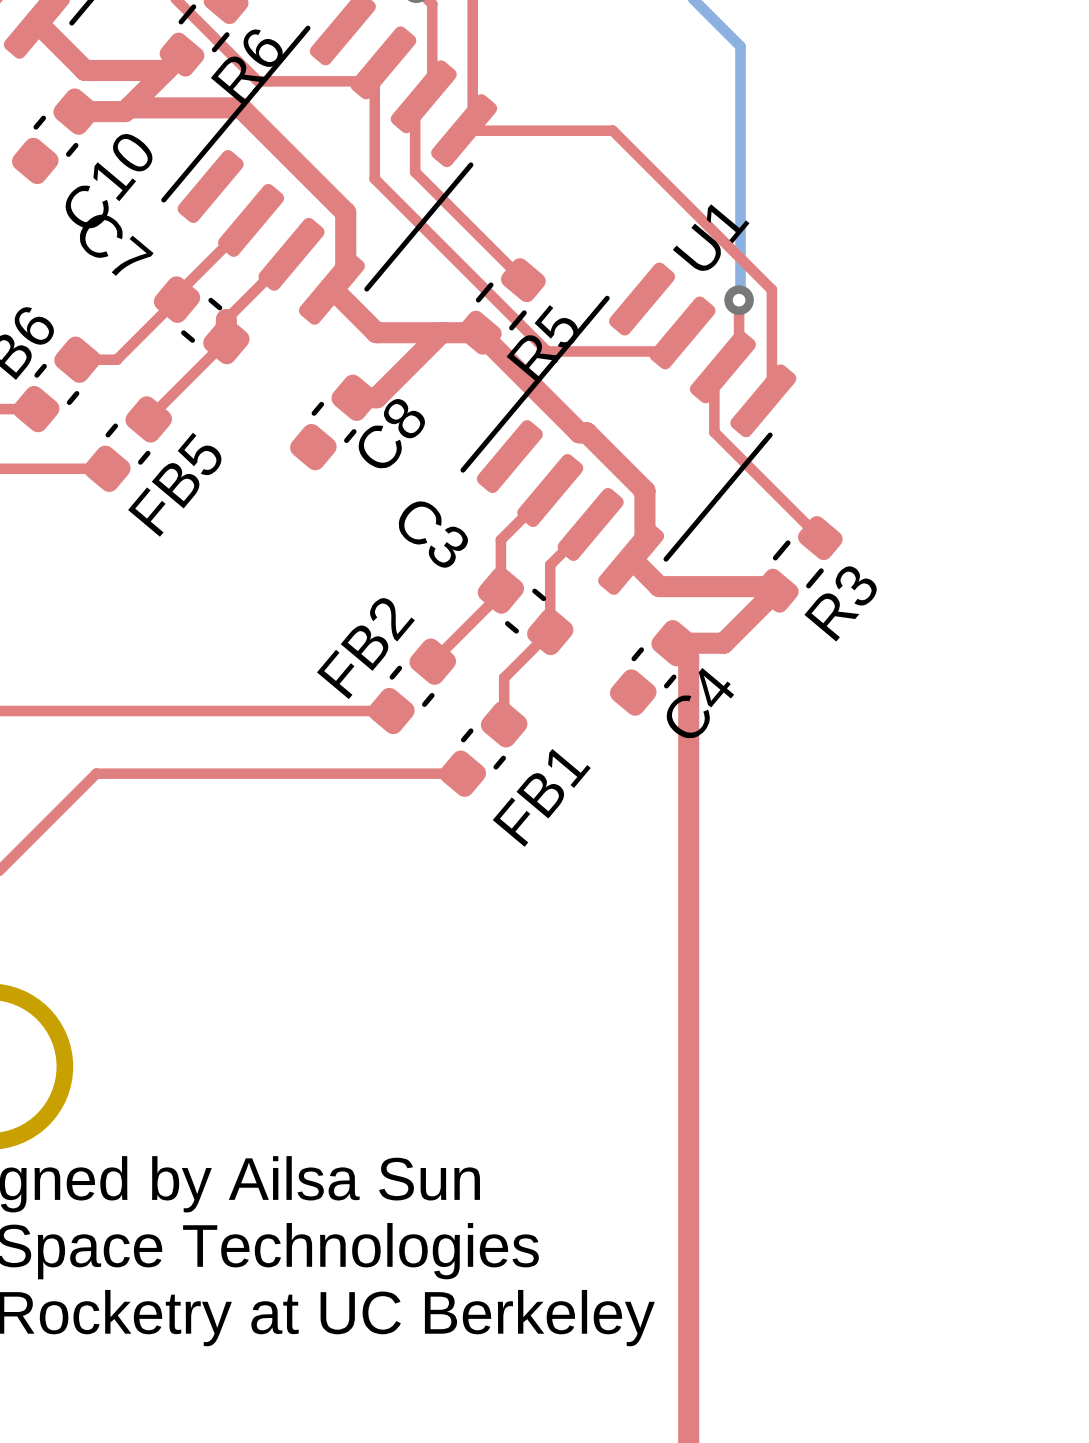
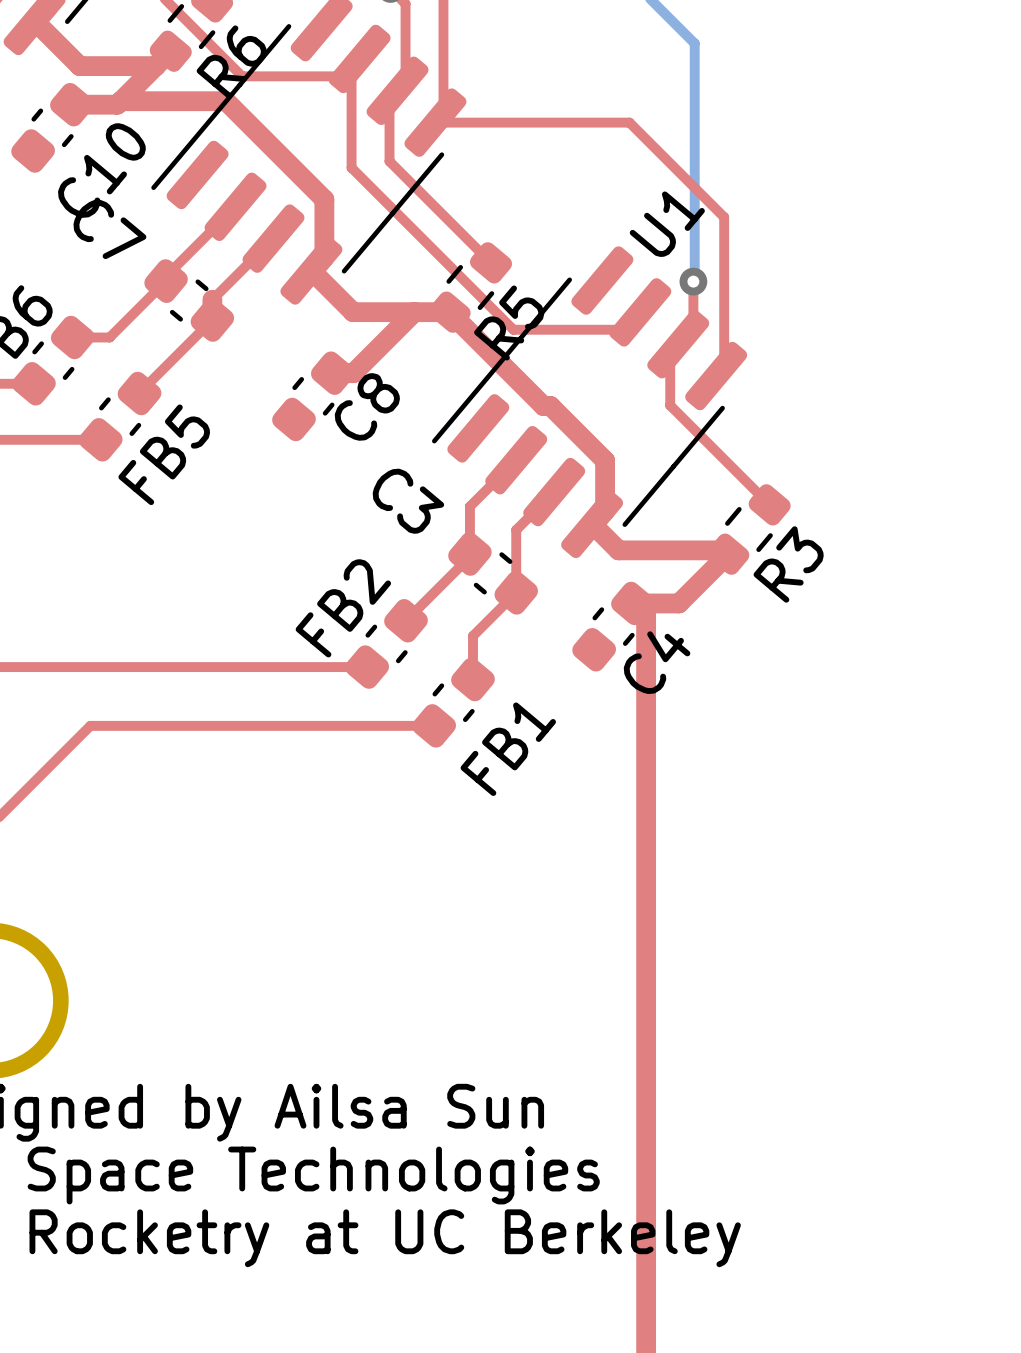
top track: (612, 130) (771, 289) -> (574, 122) (629, 122) (724, 217) (724, 271)

